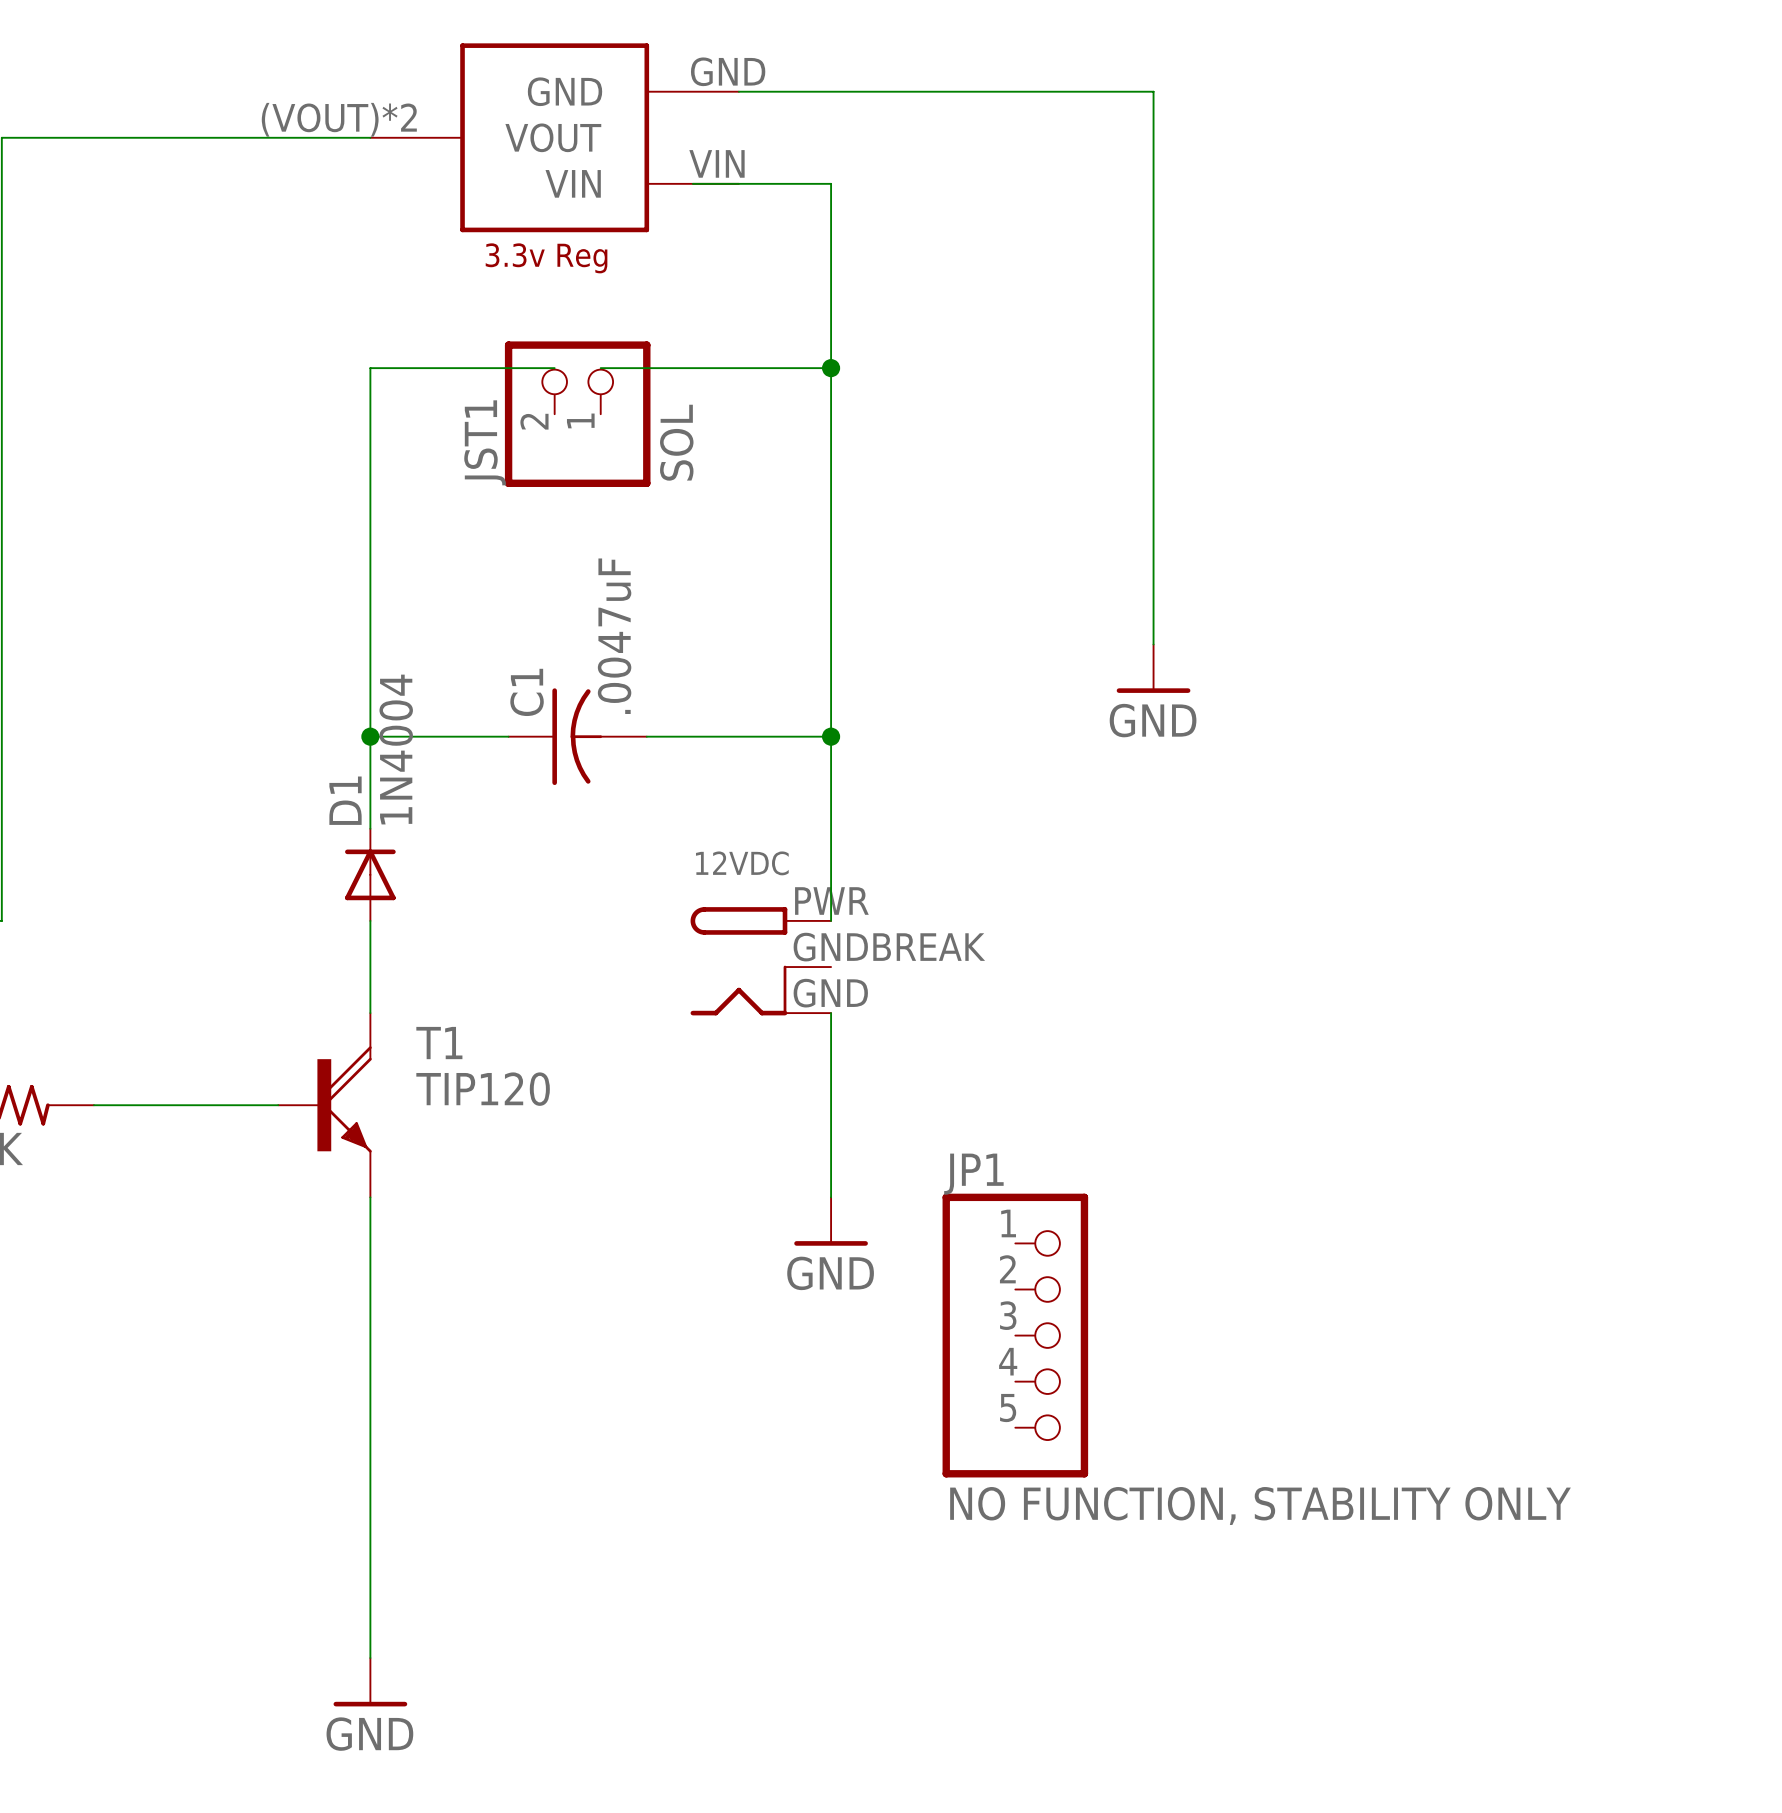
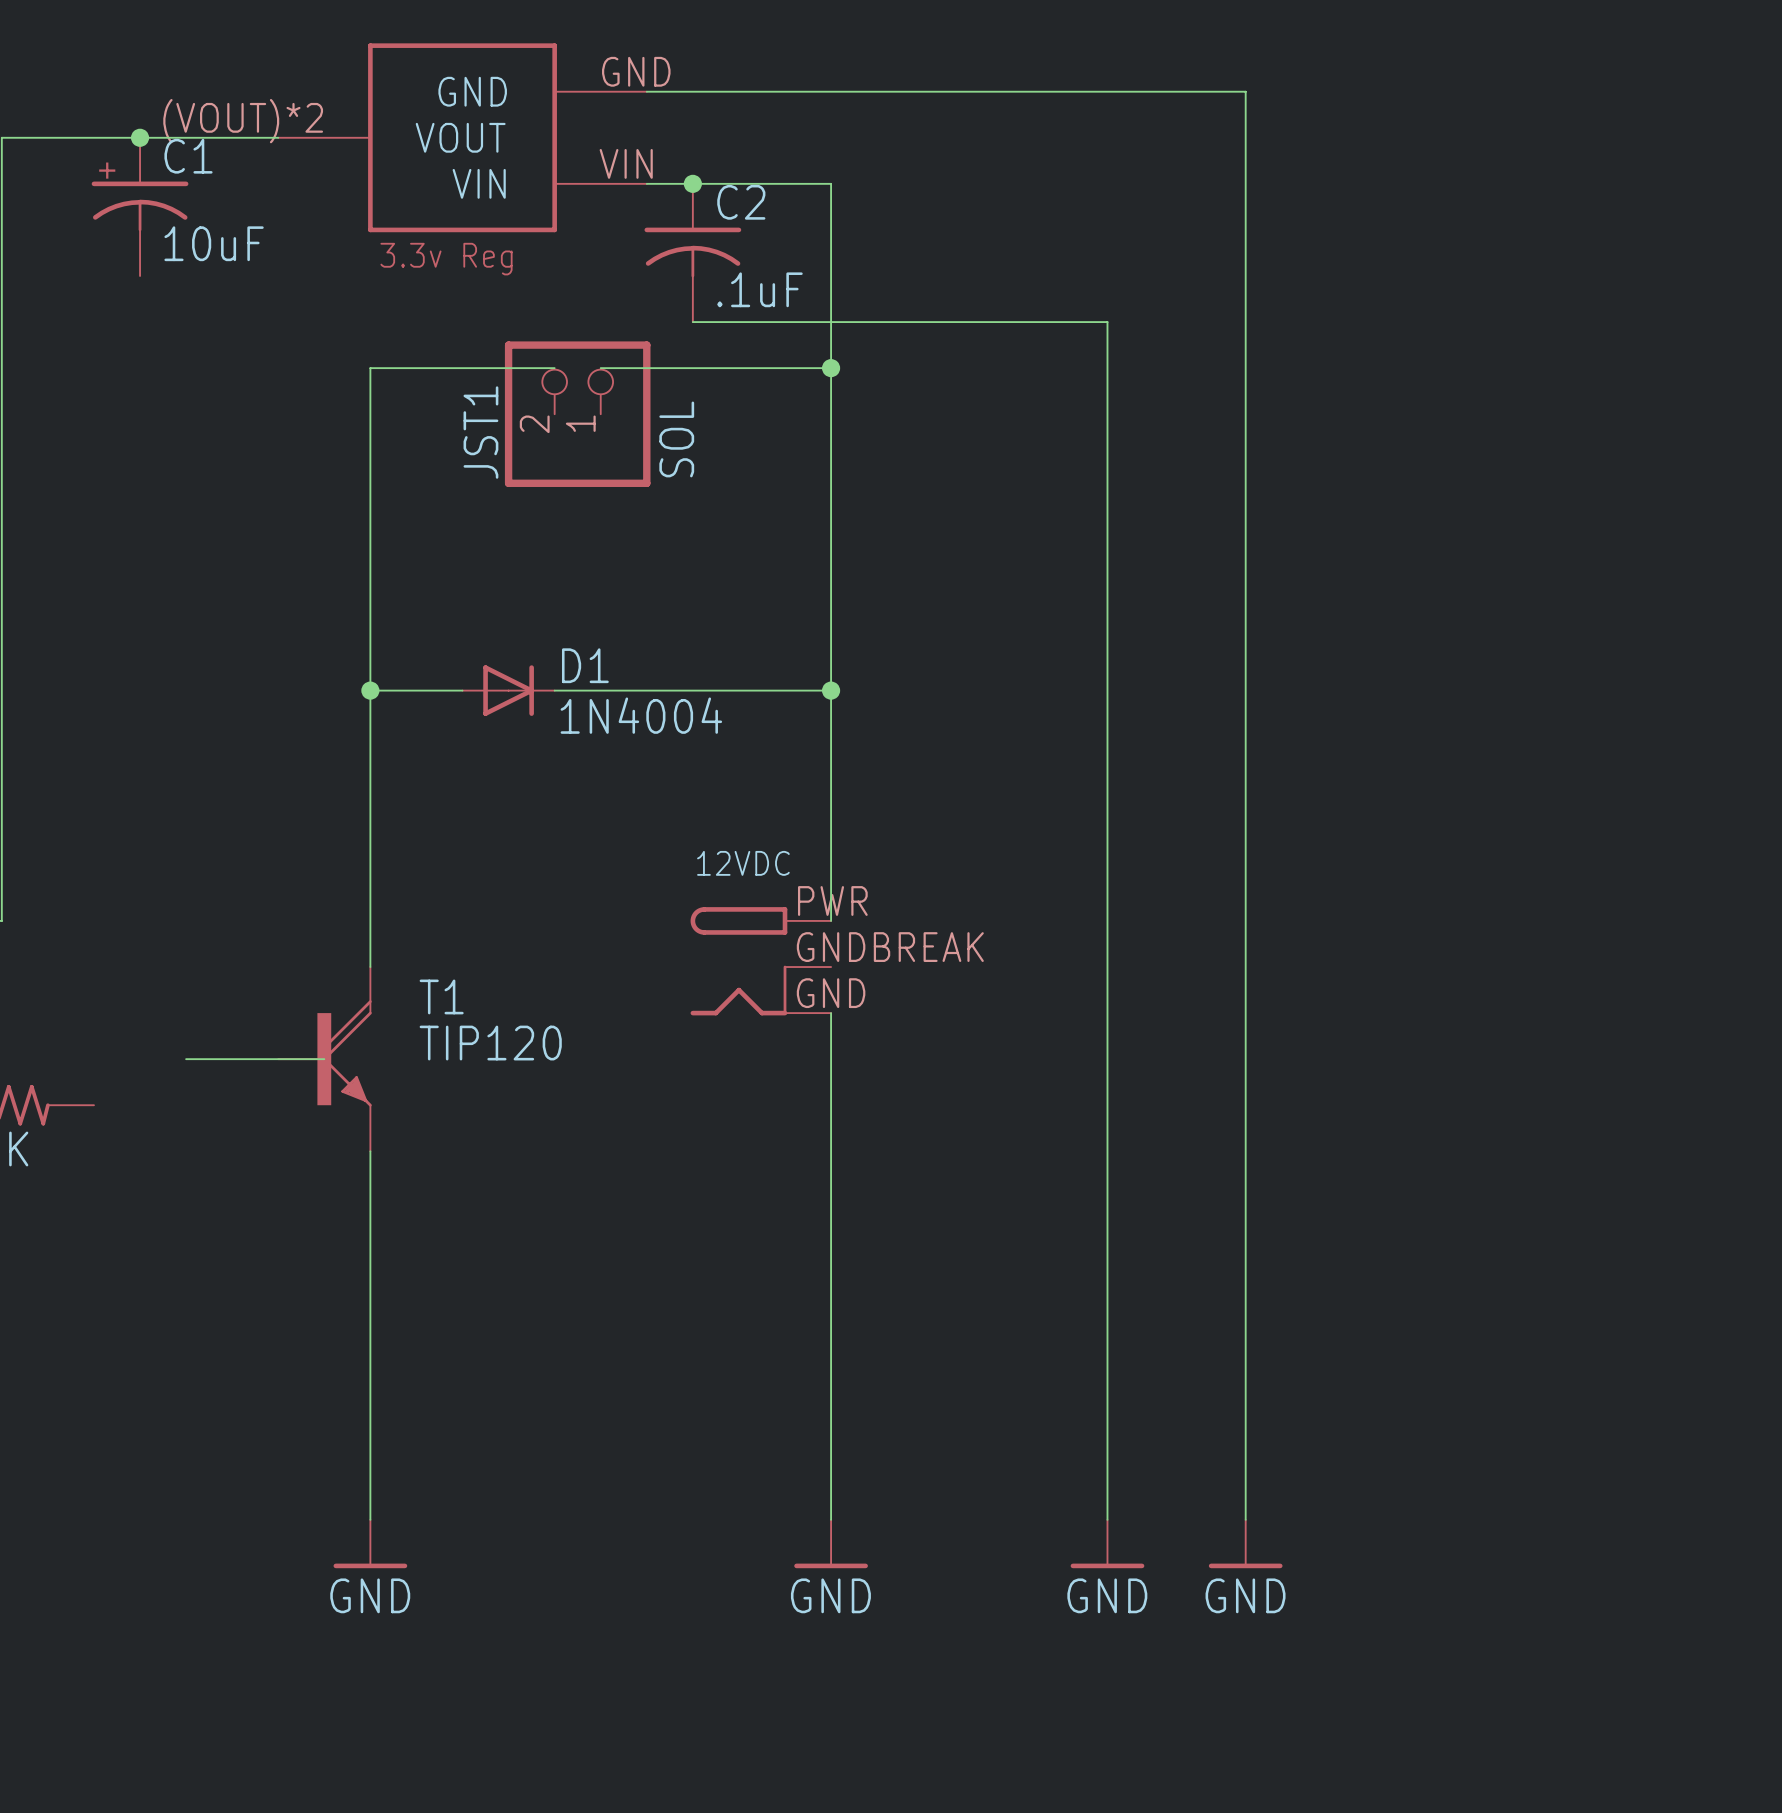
wire: (1153, 91) (1153, 644) -> (1153, 91) (1245, 91) (1245, 1519)
junction: none -> (140, 137)
part position: (554, 137) -> (462, 137)
junction: none -> (692, 183)
C2: none -> .1uF (692, 252)
wire: none -> (692, 322) (1107, 322) (1107, 1519)
C1 value: .0047uF (614, 636) -> 10uF (214, 243)
power symbol: GND (1153, 668) -> none
C1 symbol: [508, 688, 647, 786] -> [91, 137, 189, 276]
wire: none -> (370, 690) (462, 690)
wire: none -> (554, 690) (831, 690)
C1 name position: C1 (527, 692) -> C1 (188, 156)
wire: (370, 736) (508, 736) -> (186, 1059) (324, 1059)
junction position: (370, 736) -> (370, 690)
wire: (646, 736) (831, 736) -> none
junction position: (831, 736) -> (831, 690)
D1 rotation: 0° (370, 874) -> 90° clockwise (508, 690)
D1 position: (370, 874) -> (508, 690)
wire: (93, 1105) (278, 1105) -> none
T1 position: (325, 1105) -> (325, 1059)
wire: none -> (831, 1197) (831, 1519)
power symbol: GND (831, 1221) -> none
JP1: NO FUNCTION, STABILITY ONLY (1015, 1335) -> none
wire: (370, 1519) (370, 1658) -> none
power symbol: none -> GND (831, 1544)
power symbol: none -> GND (1107, 1544)
power symbol: none -> GND (1245, 1544)
power symbol position: GND (370, 1682) -> GND (370, 1544)

